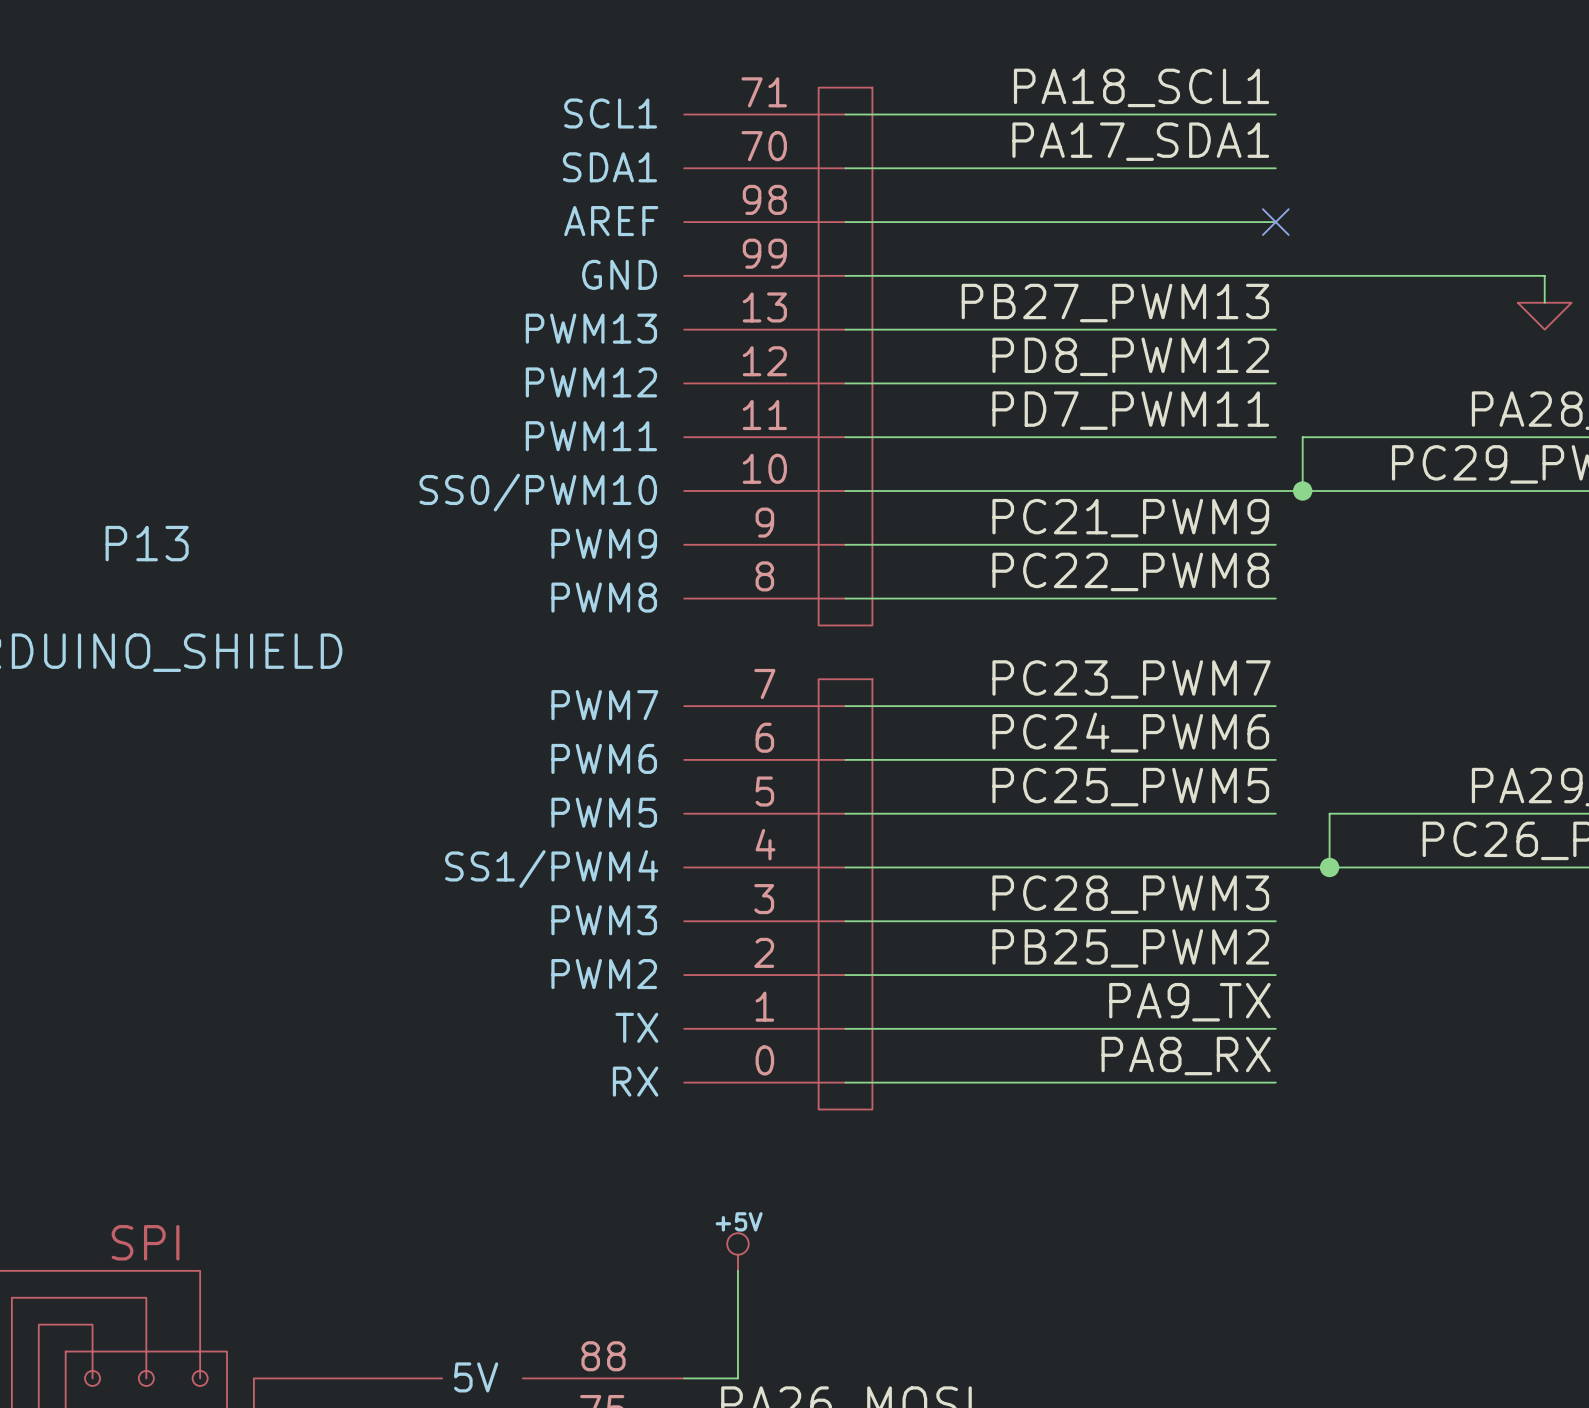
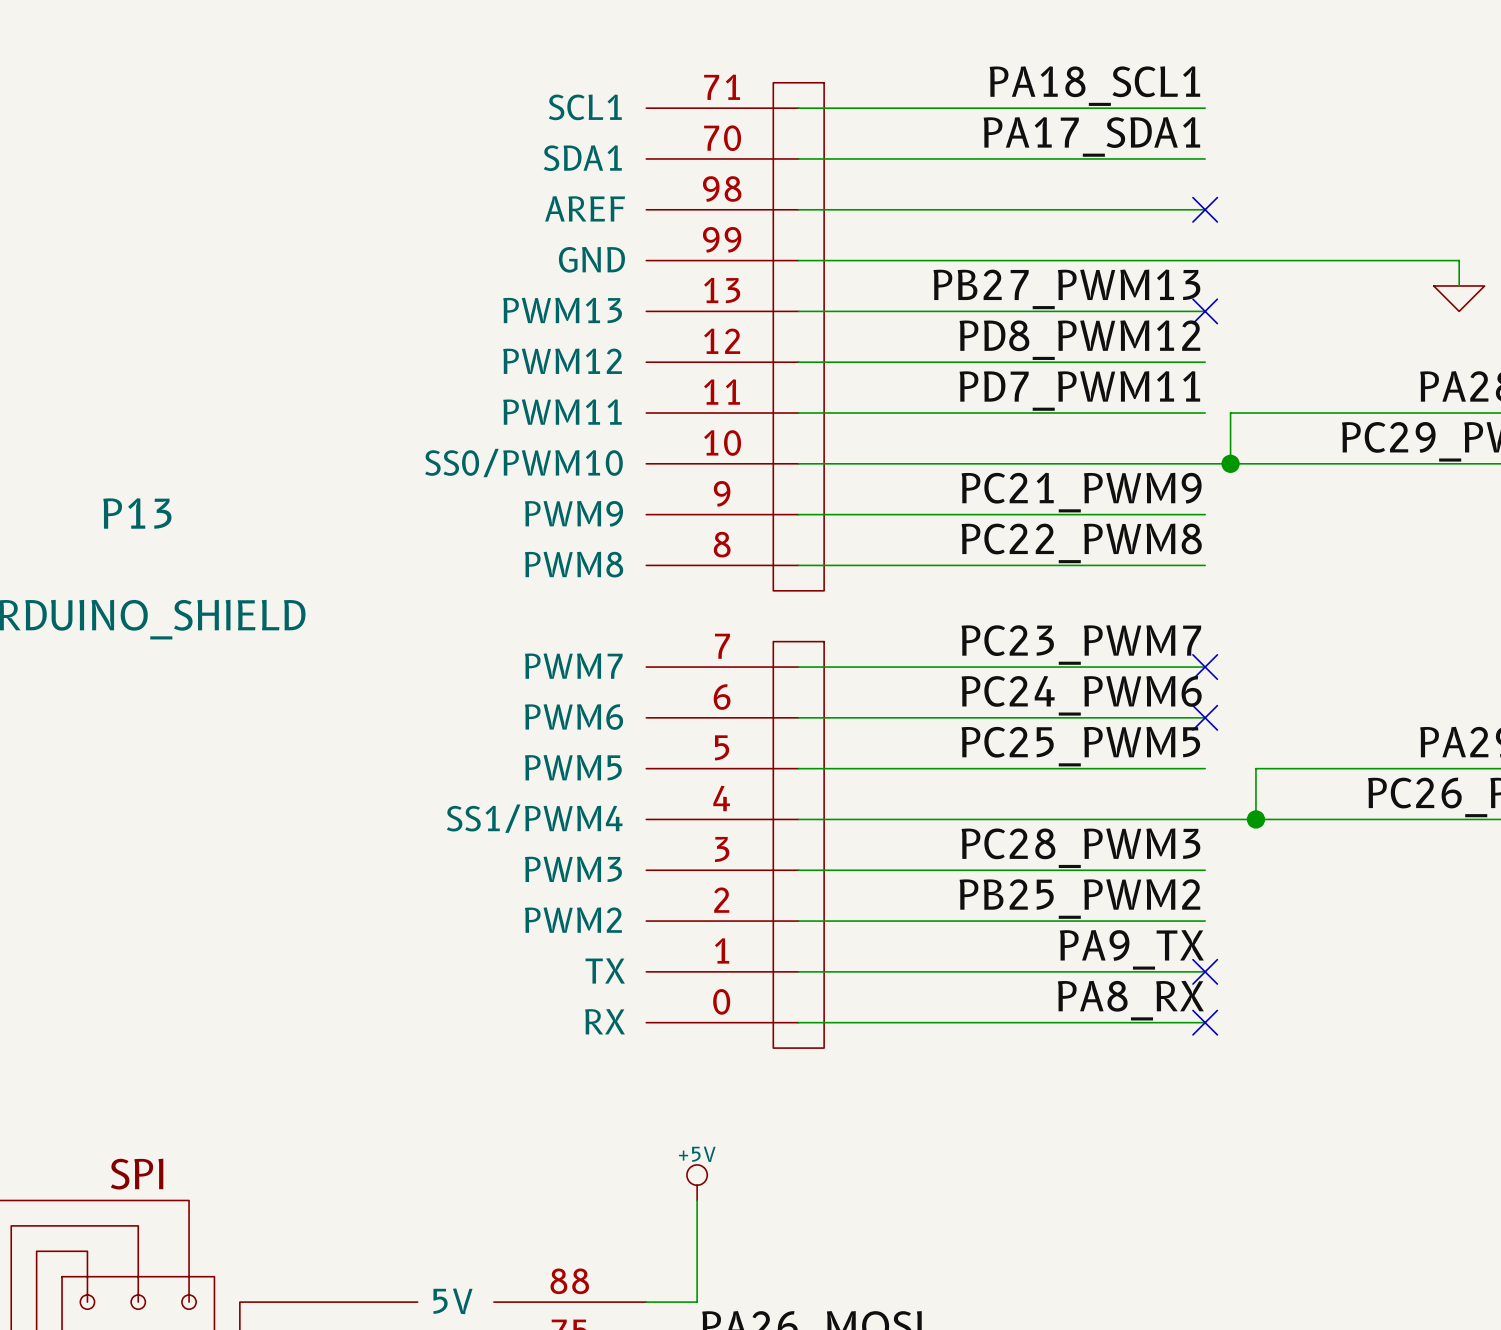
no-connect mark: none -> (1205, 311)
no-connect mark: none -> (1205, 667)
no-connect mark: none -> (1205, 717)
no-connect mark: none -> (1205, 971)
no-connect mark: none -> (1205, 1022)

